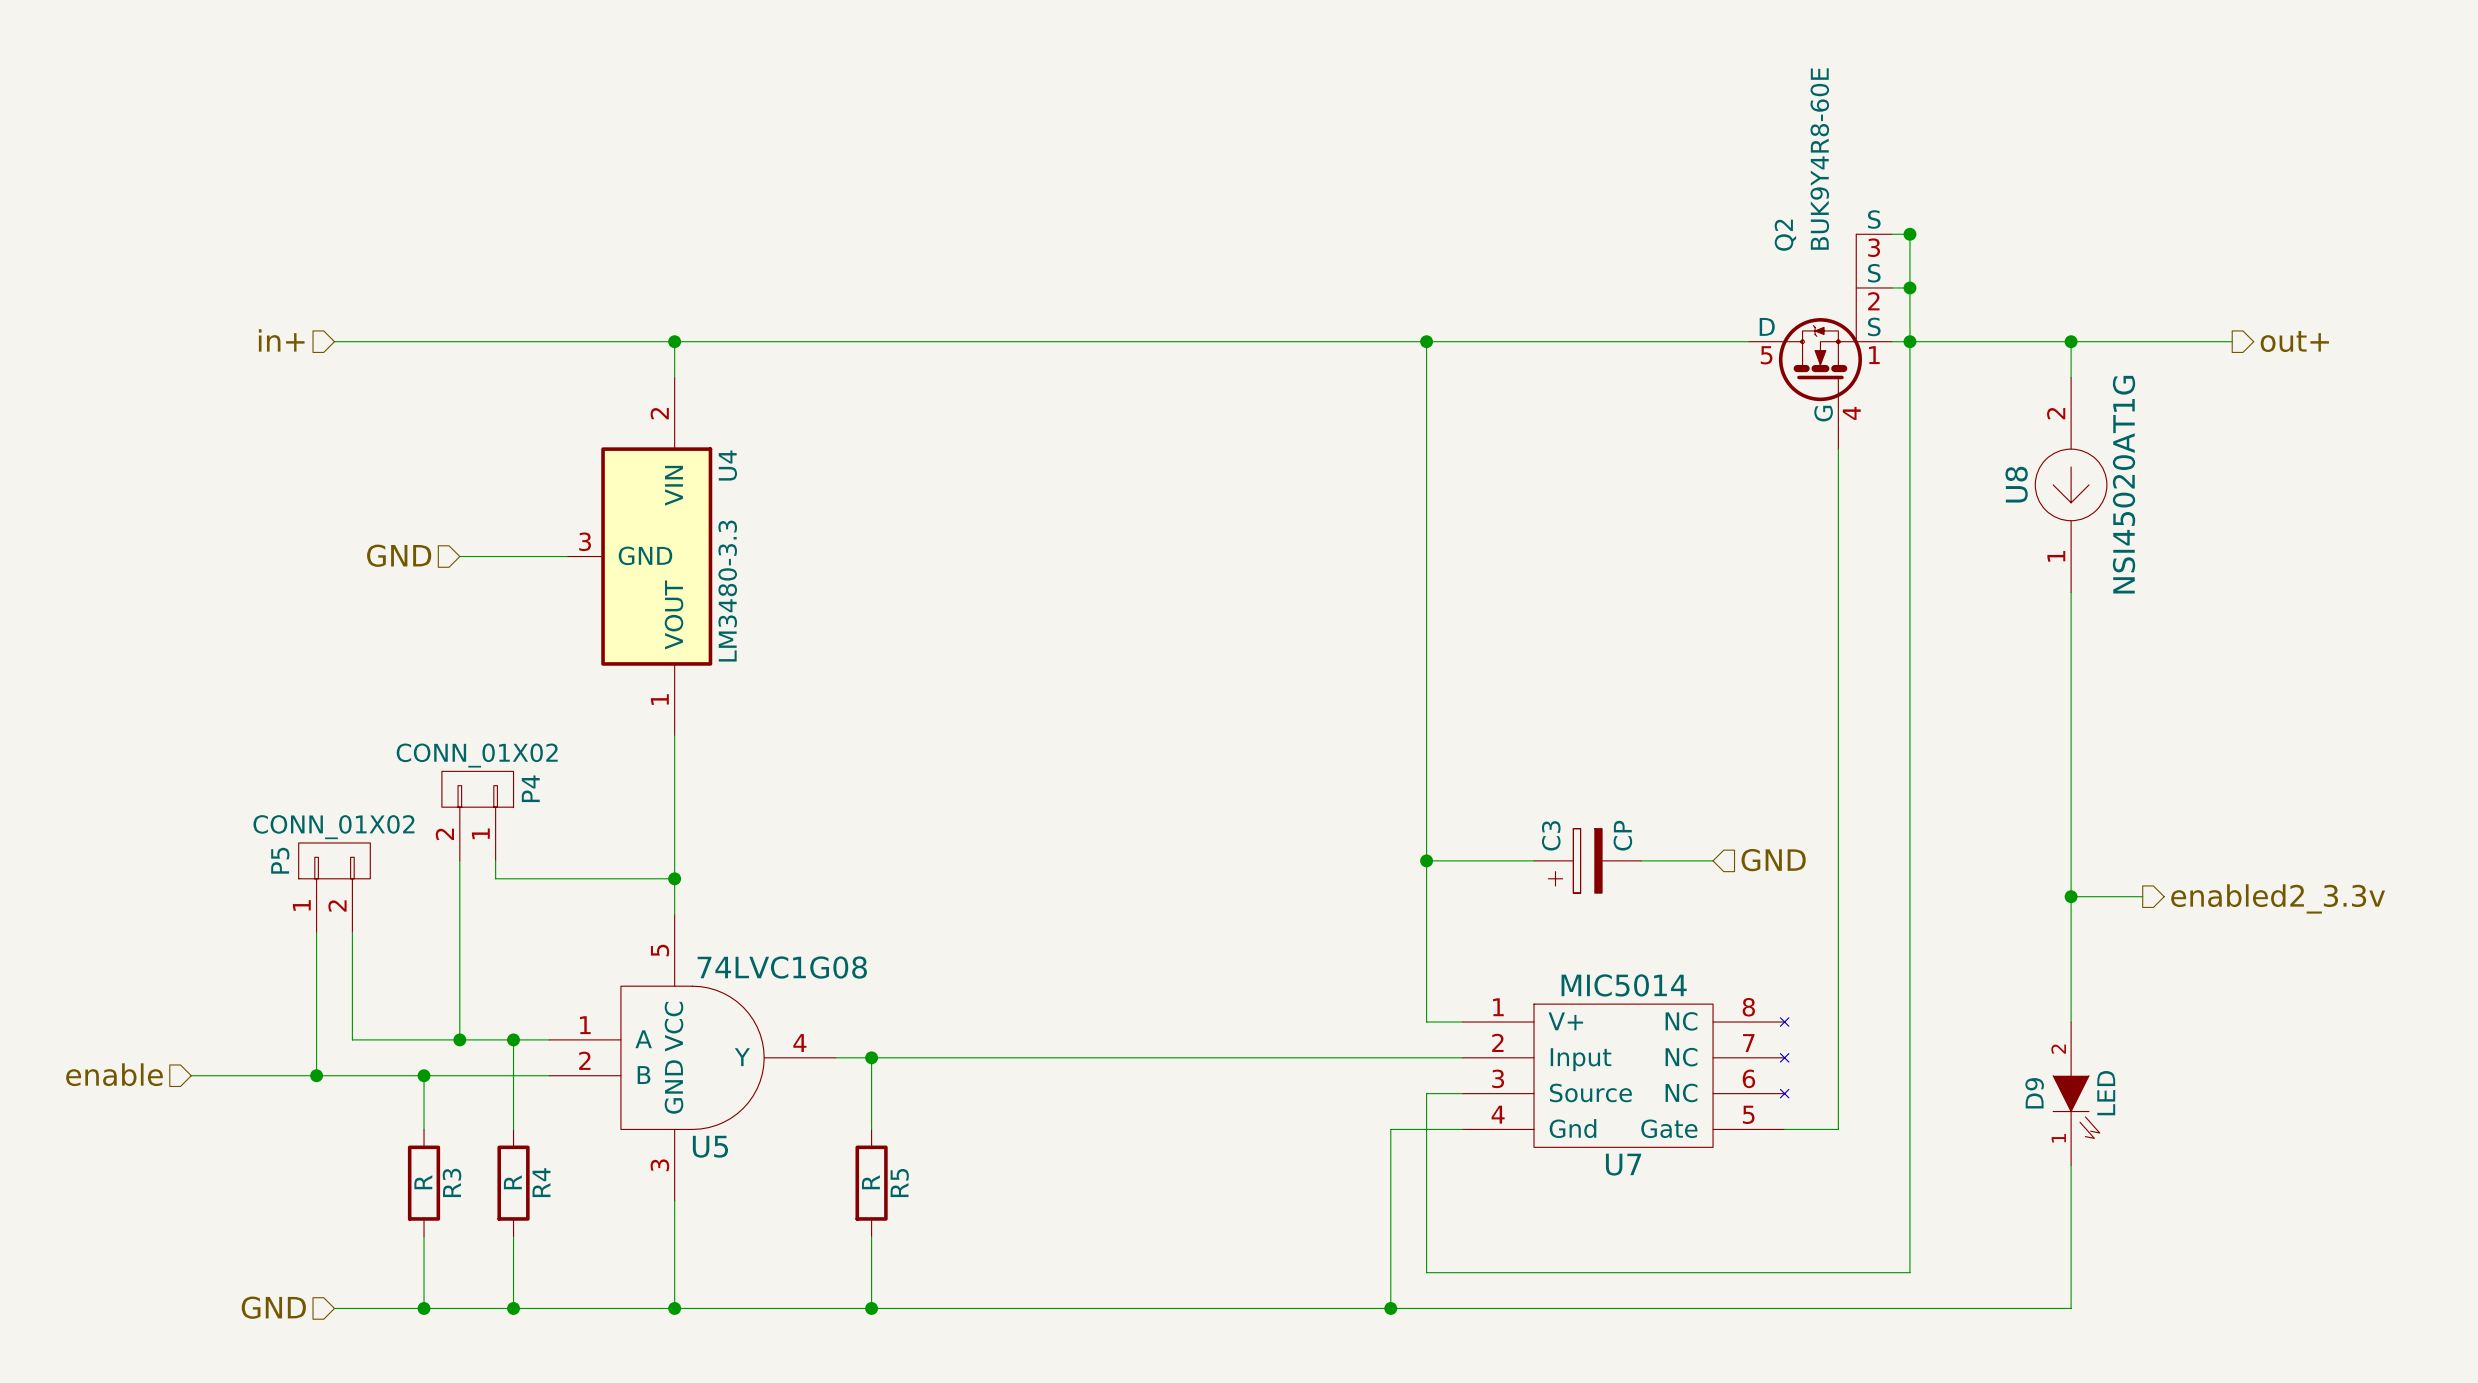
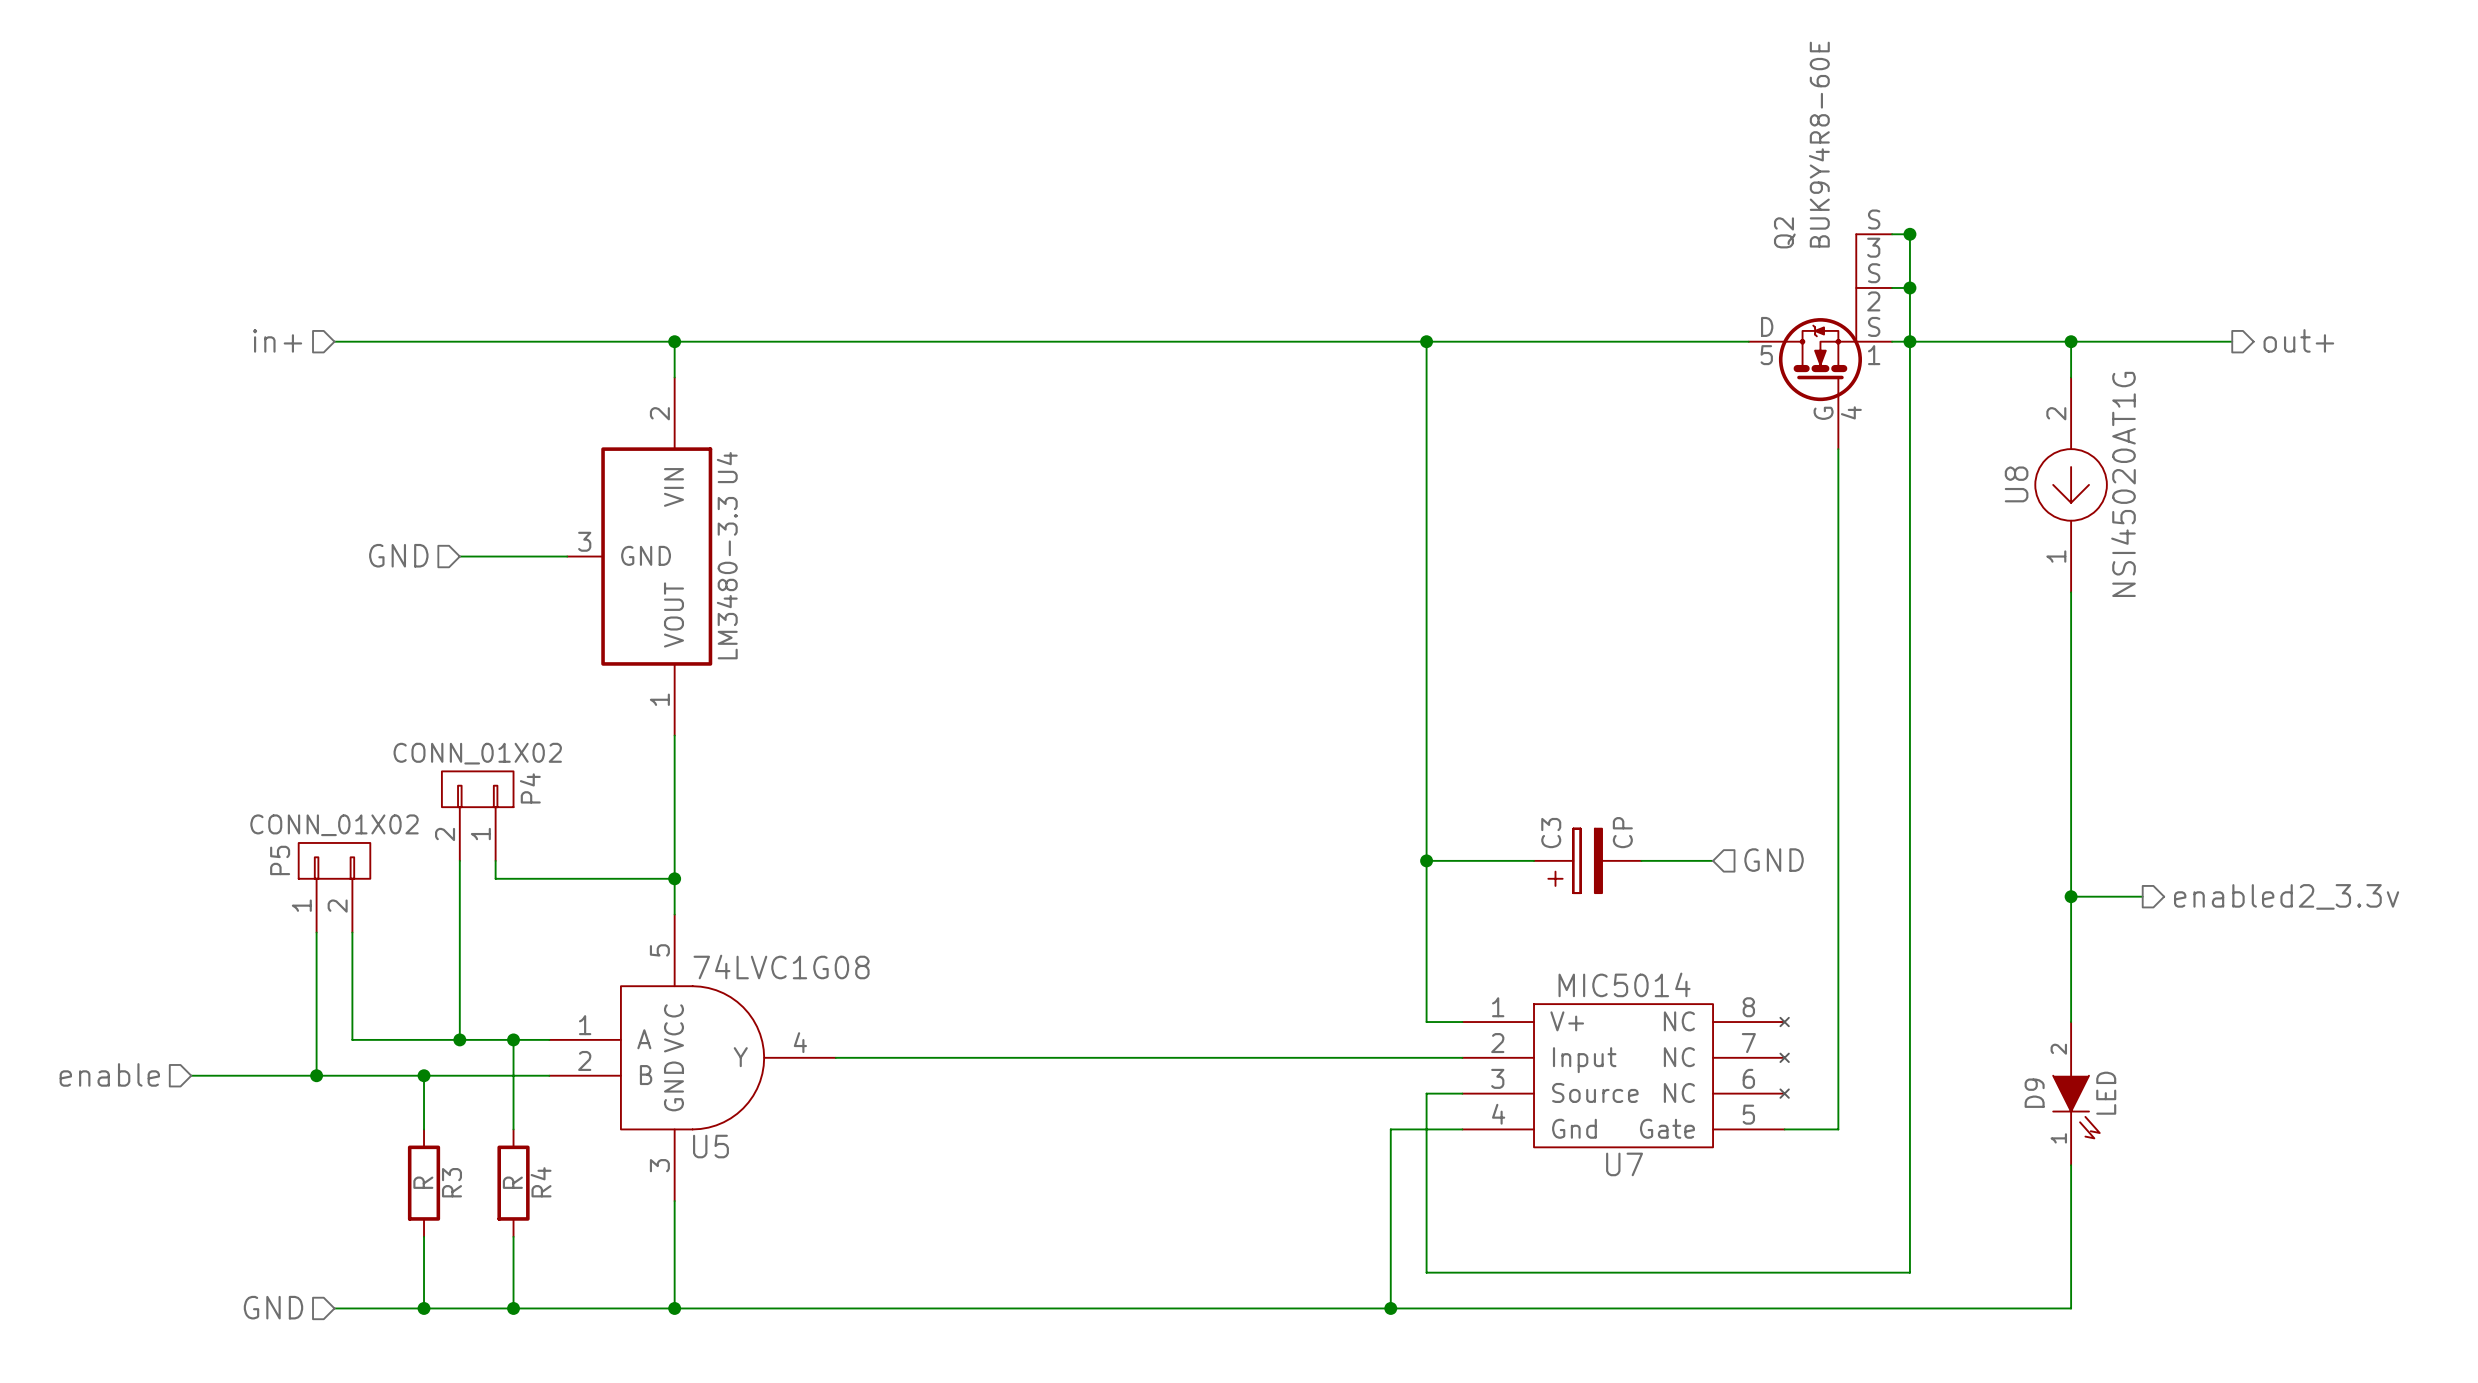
wire: (871, 1057) (871, 1129) -> none
junction: (871, 1057) -> none
R5: R (871, 1183) -> none
wire: (871, 1236) (871, 1308) -> none
junction: (871, 1308) -> none

